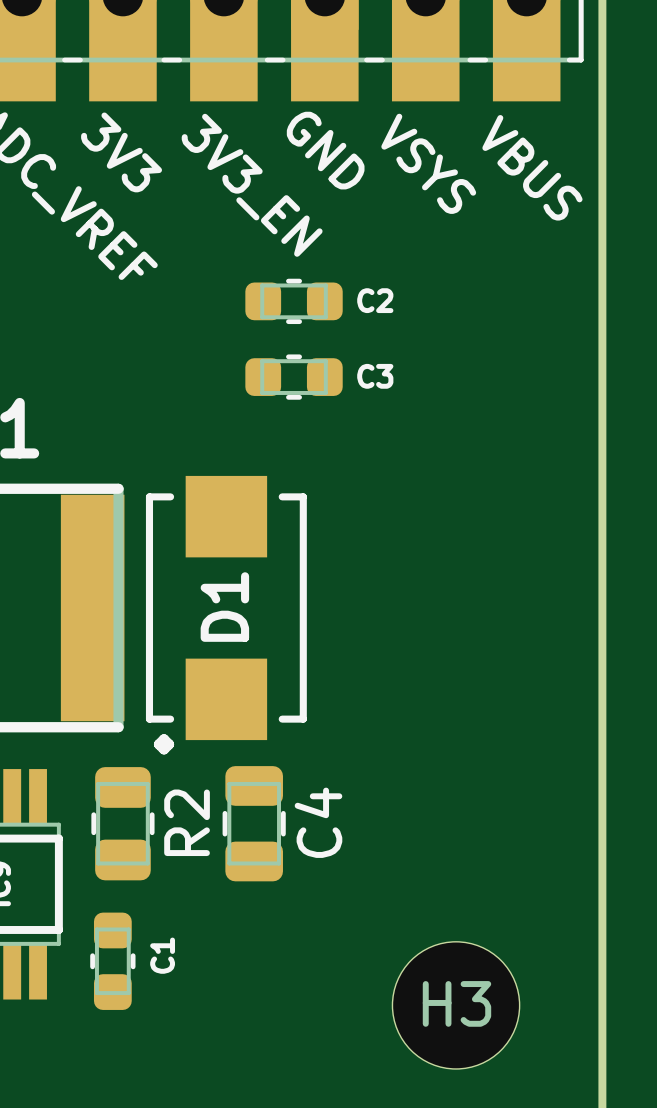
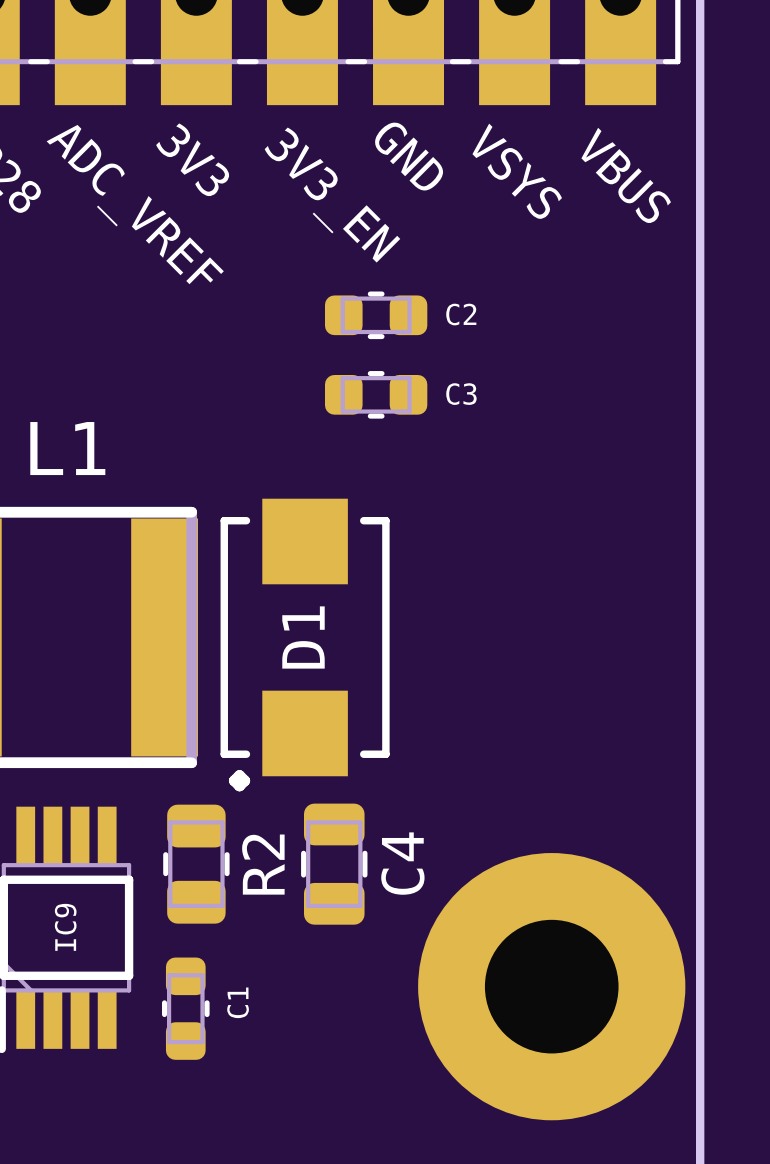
part: none -> (551, 986)
H3: (456, 1005) -> none

